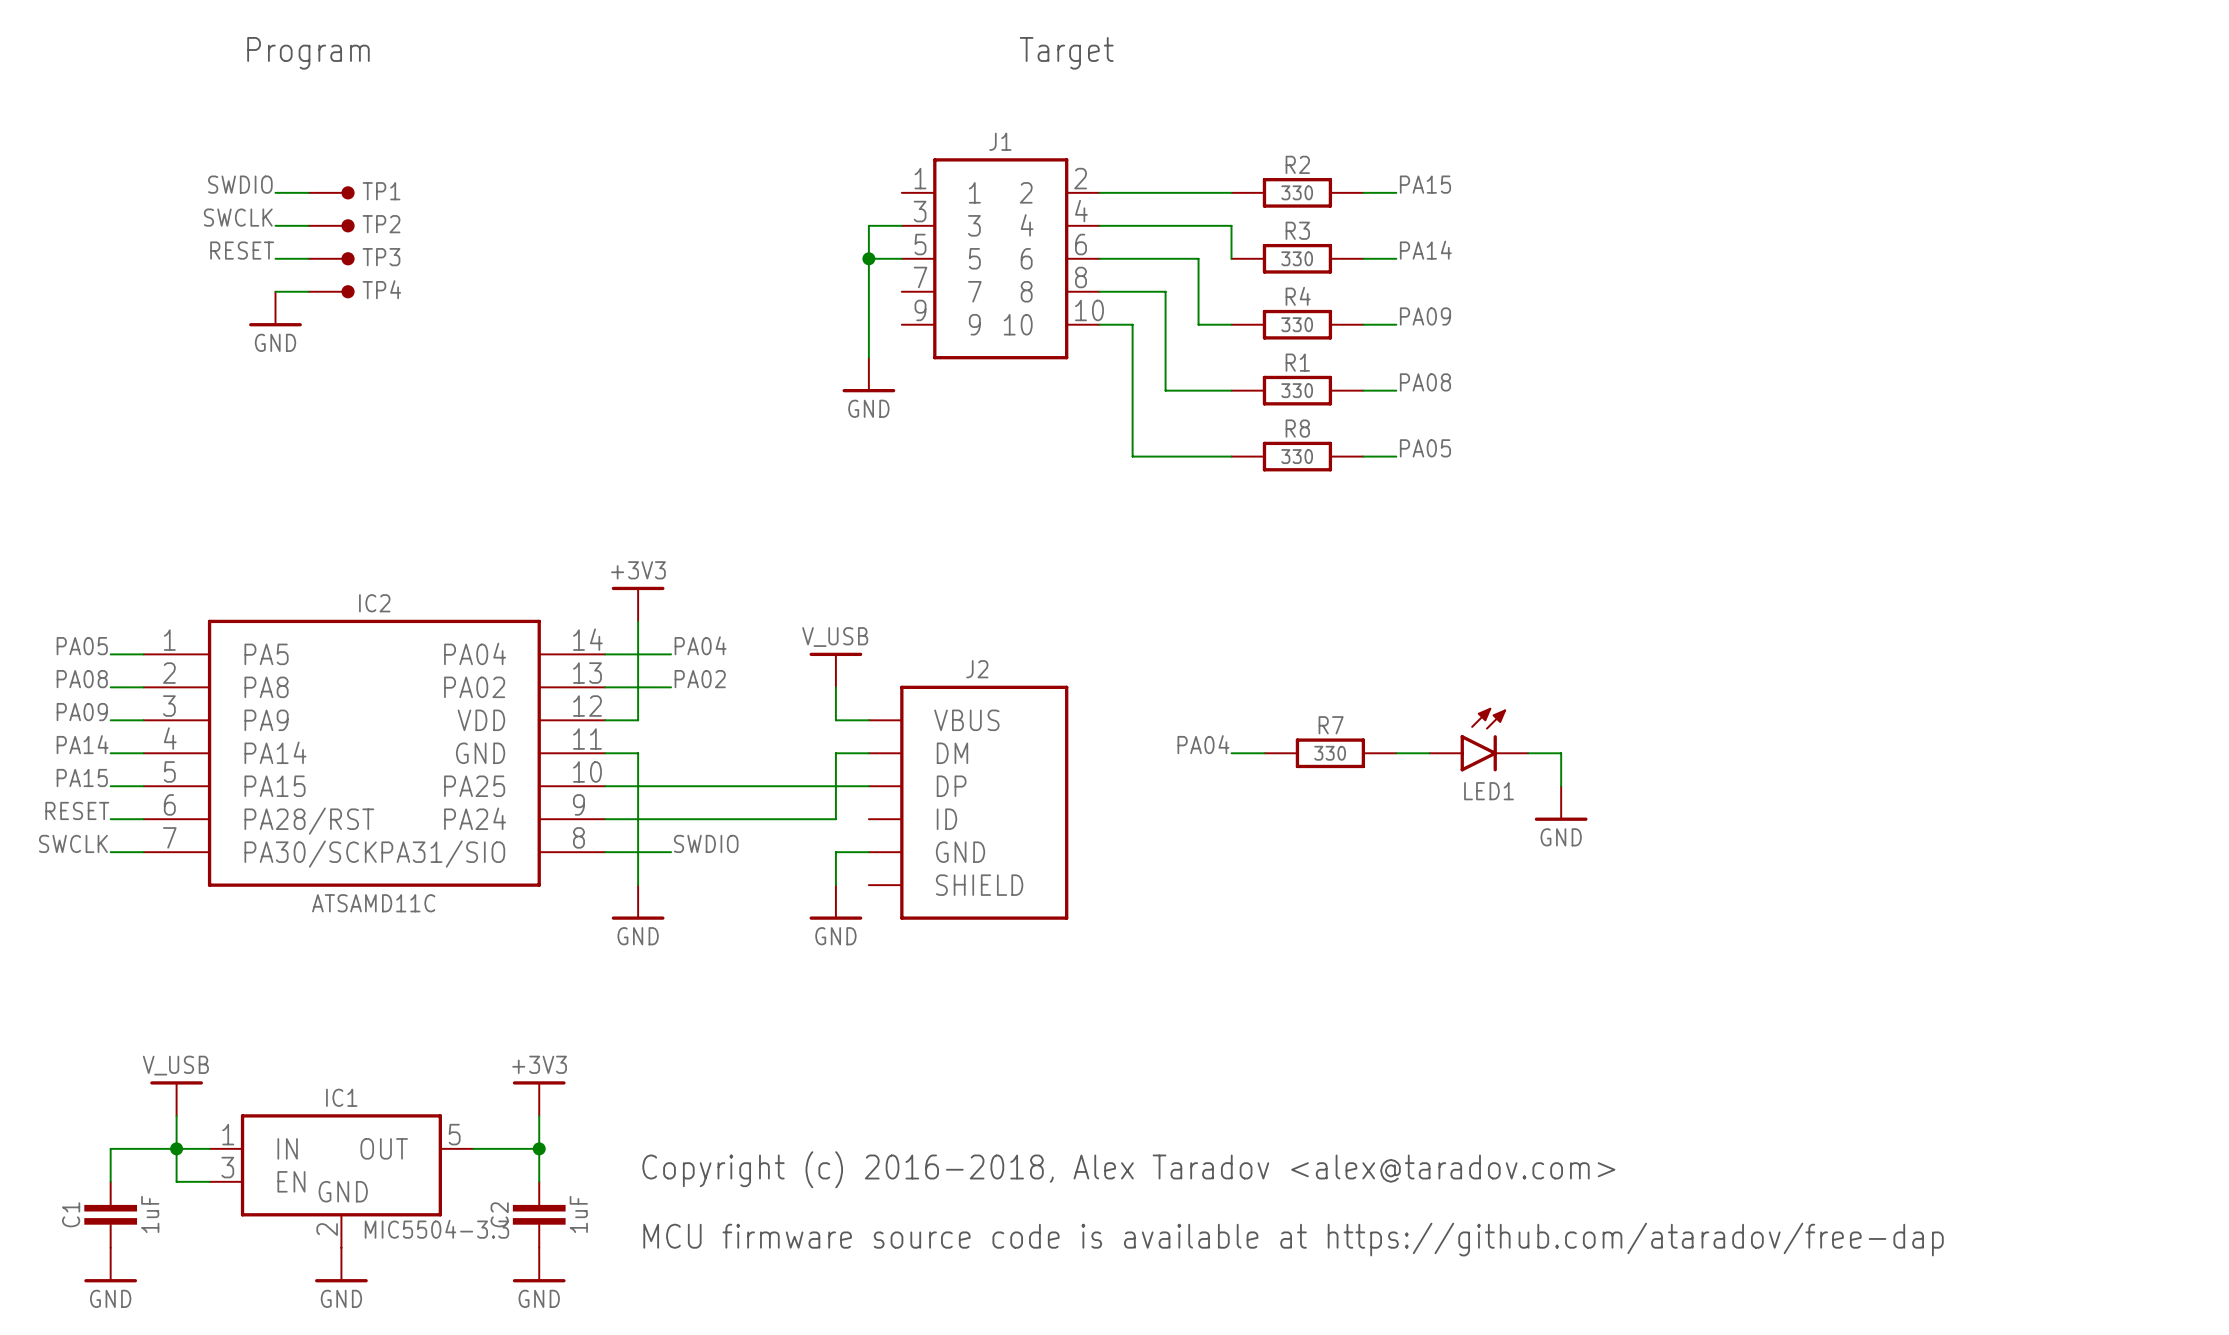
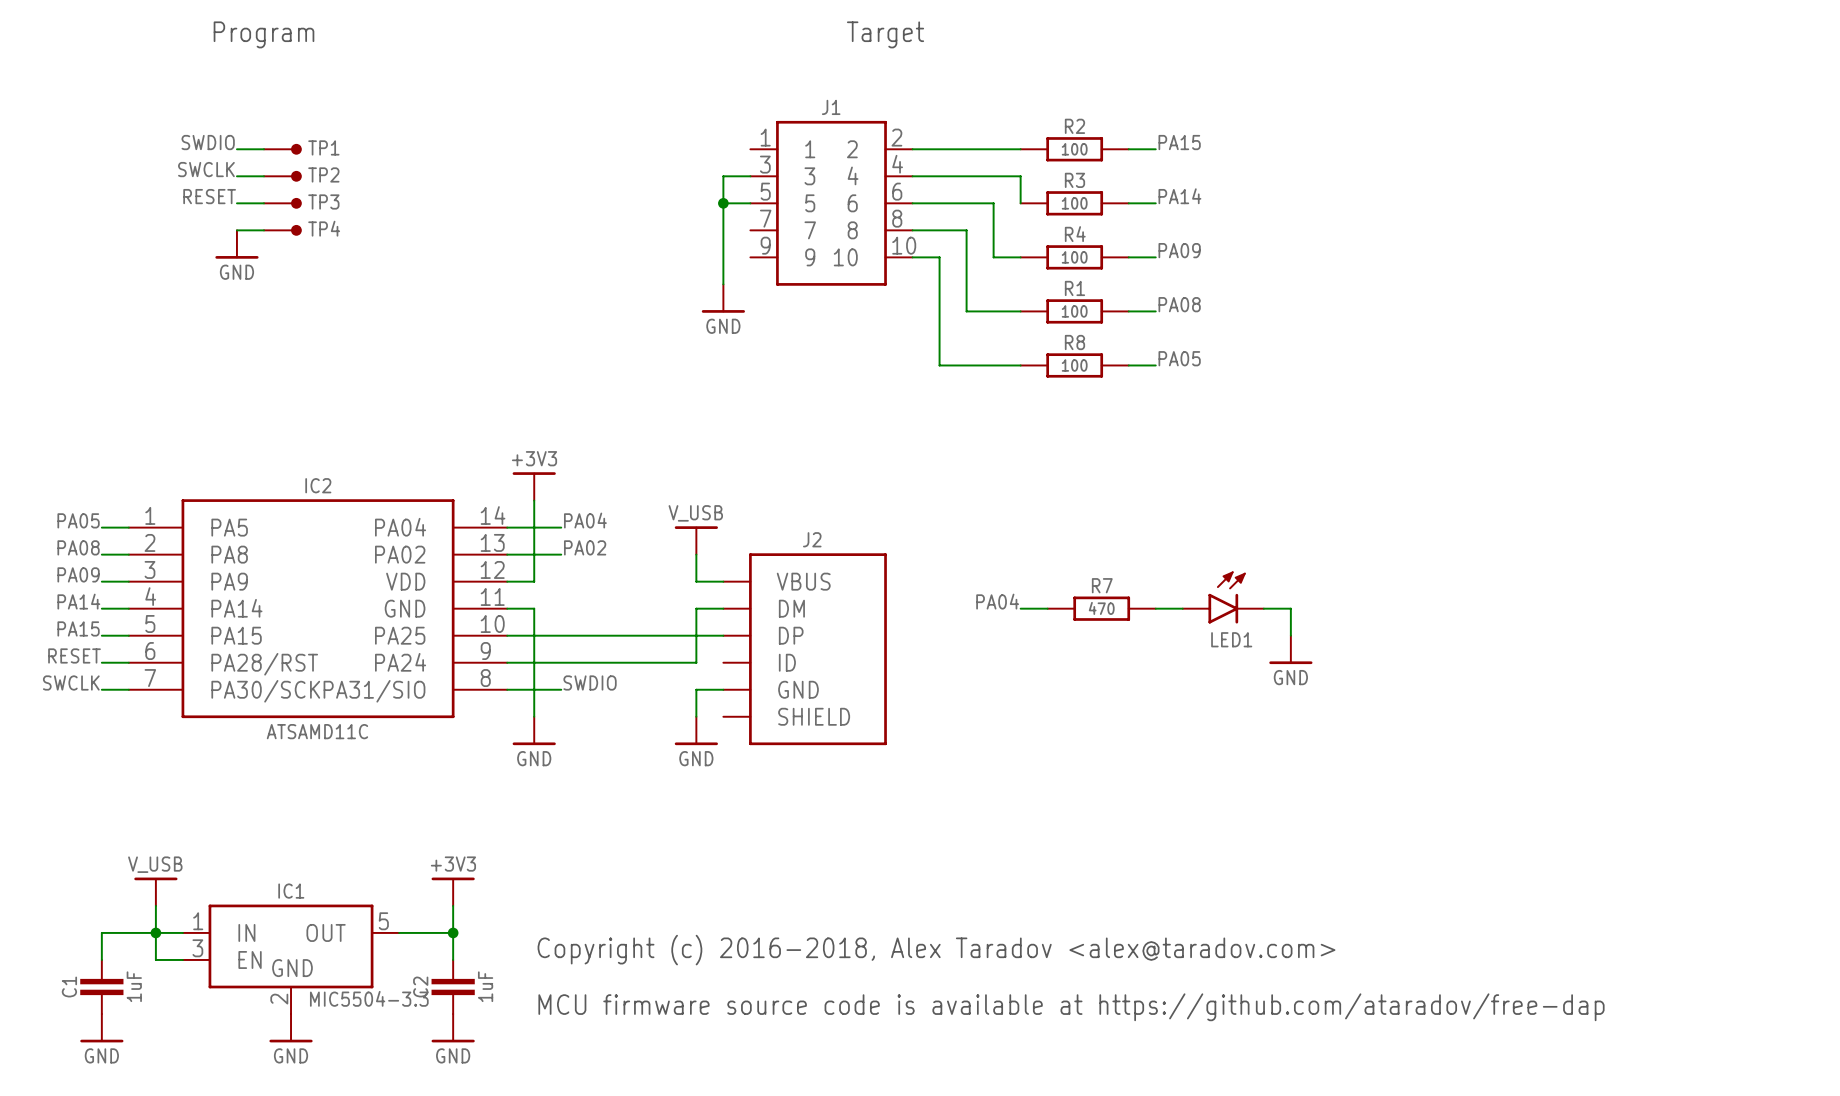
R2 value: 330 (1297, 192) -> 100 (1074, 149)
R3 value: 330 (1297, 258) -> 100 (1074, 203)
R4 value: 330 (1297, 324) -> 100 (1074, 257)
R1 value: 330 (1297, 390) -> 100 (1074, 311)
R8 value: 330 (1297, 456) -> 100 (1074, 365)
R7 value: 330 (1330, 753) -> 470 (1101, 608)

